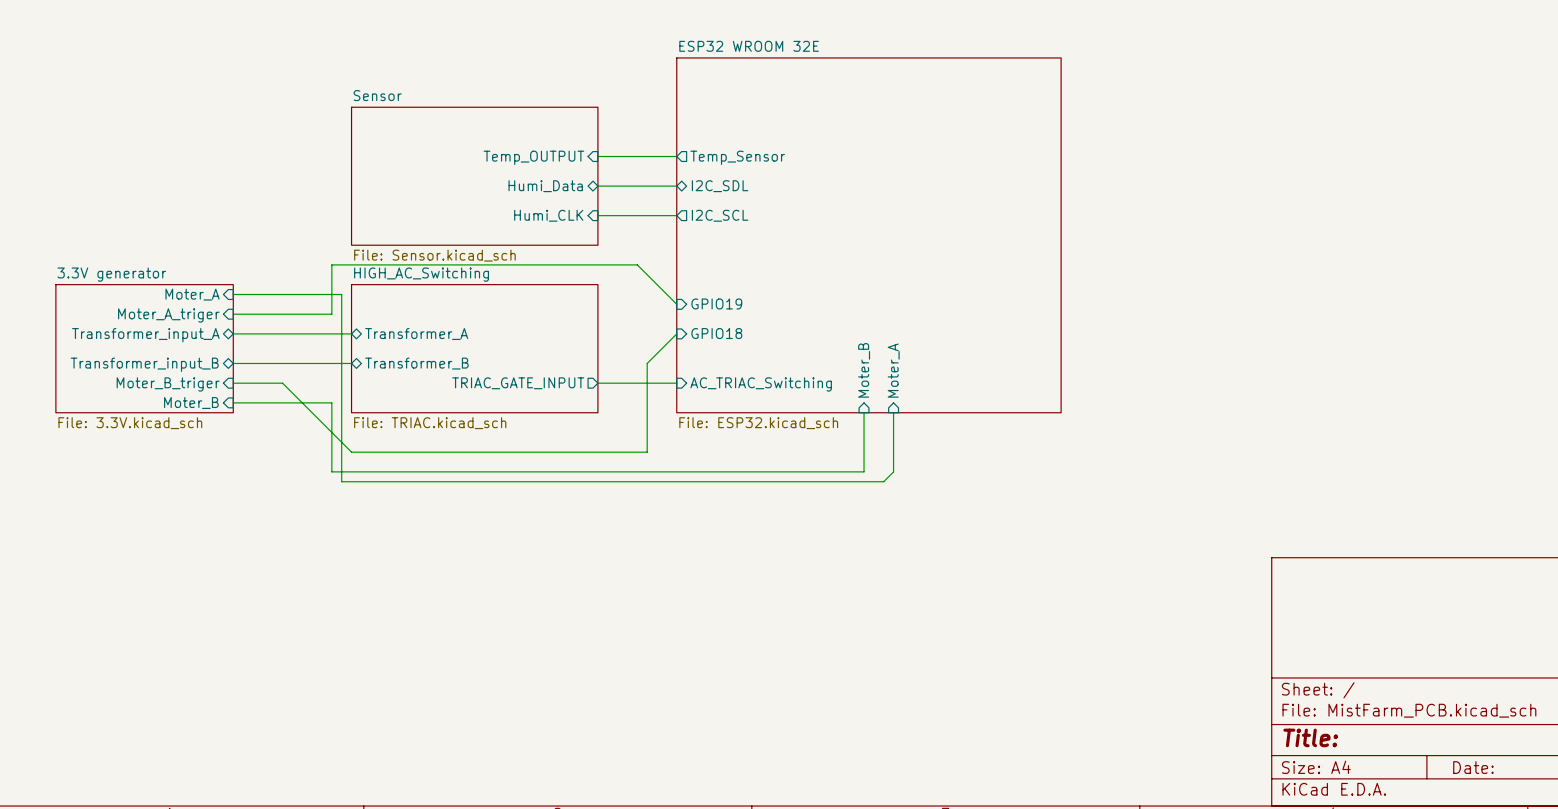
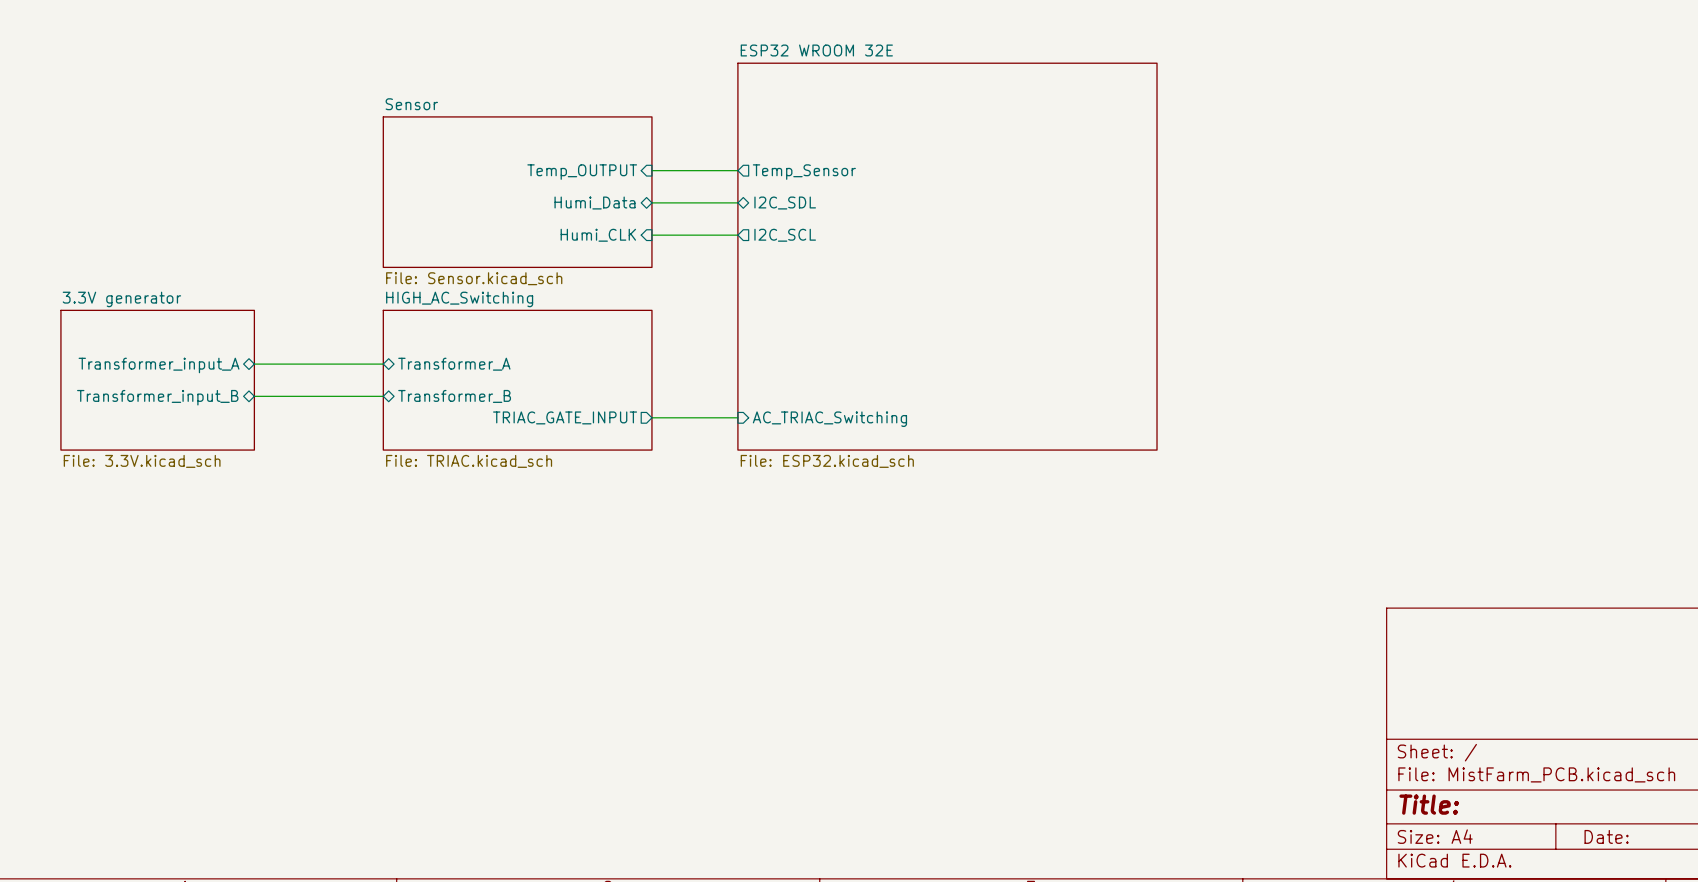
sheet pin: Moter_A (192, 294) -> none
wire: (233, 294) (341, 294) (341, 481) (883, 481) (893, 471) (893, 412) -> none
sheet pin: GPIO19 (716, 303) -> none
wire: (676, 304) (637, 264) (331, 264) (331, 314) (233, 314) -> none
sheet pin: Moter_A_triger (168, 315) -> none
wire: (676, 333) (647, 363) (647, 452) (351, 452) (282, 383) (233, 383) -> none
sheet pin: GPIO18 (716, 333) -> none
sheet pin: Moter_B (864, 370) -> none
sheet pin: Moter_A (893, 370) -> none
sheet pin: Moter_B_triger (168, 384) -> none
wire: (233, 402) (331, 402) (331, 471) (864, 471) (864, 412) -> none
sheet pin: Moter_B (191, 403) -> none

